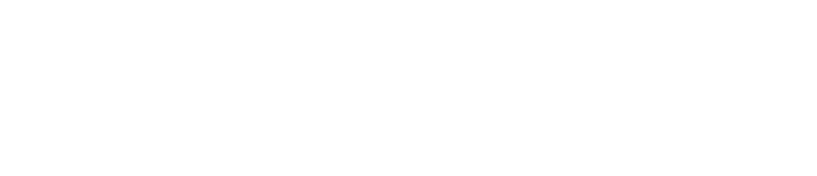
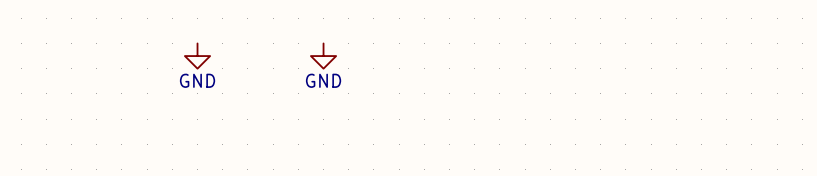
power symbol: none -> GND (197, 56)
power symbol: none -> GND (323, 56)

